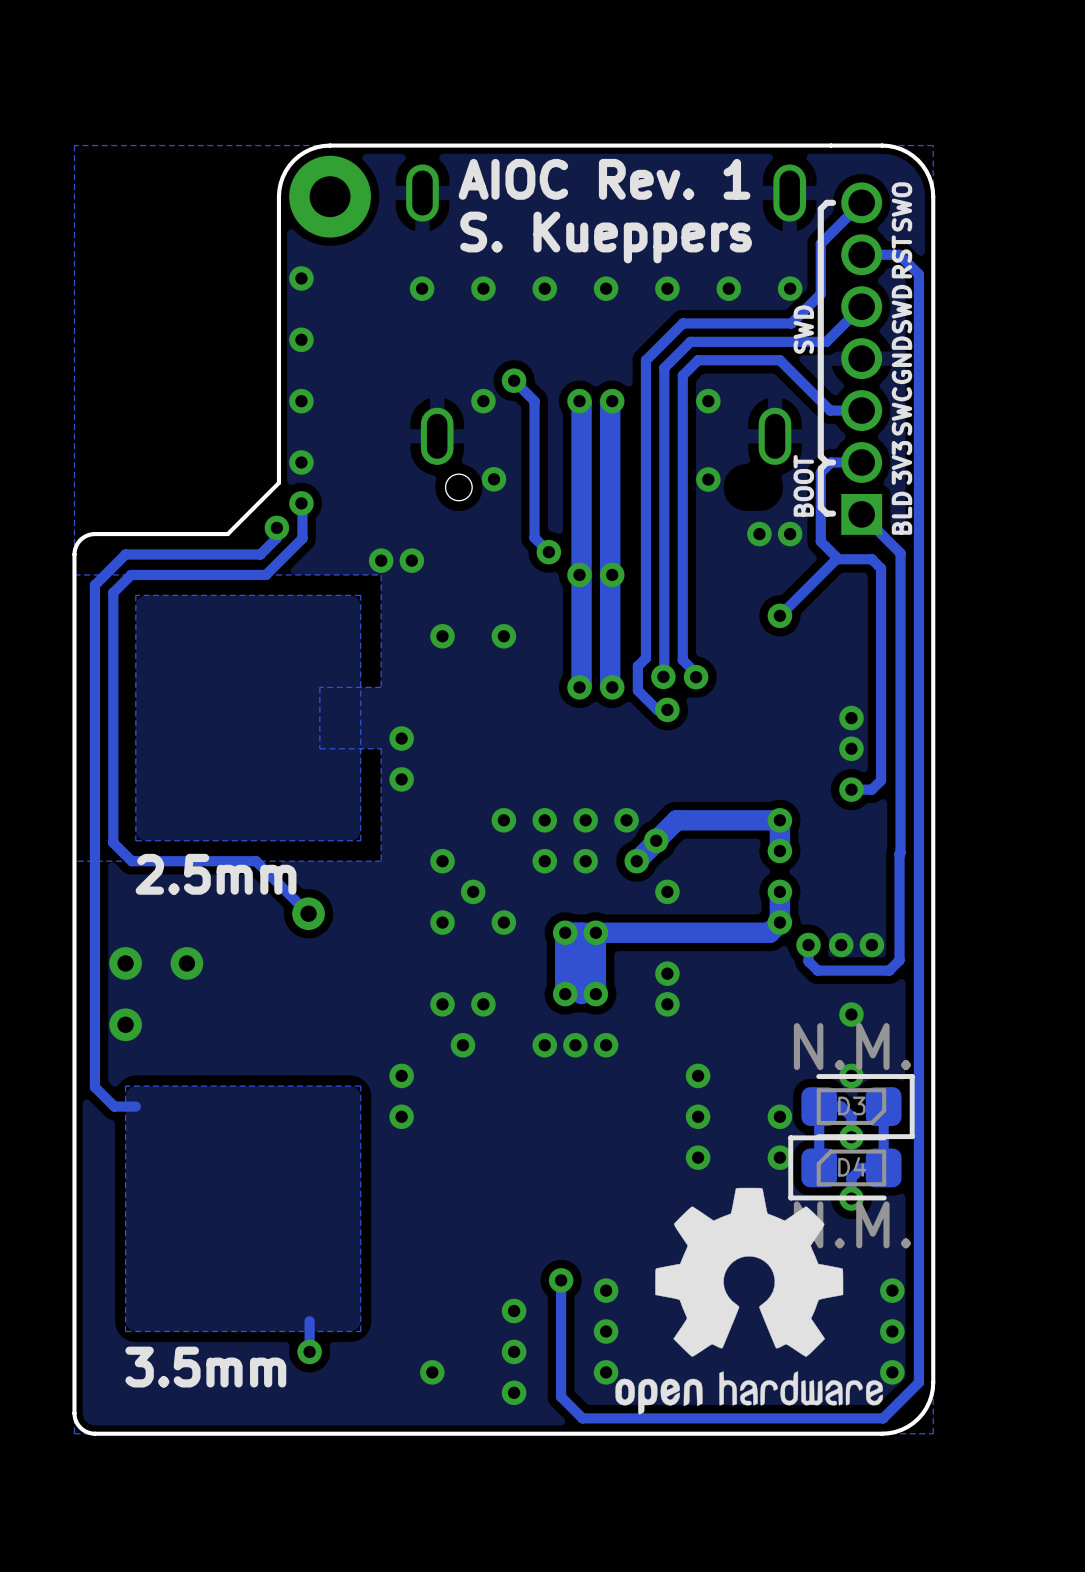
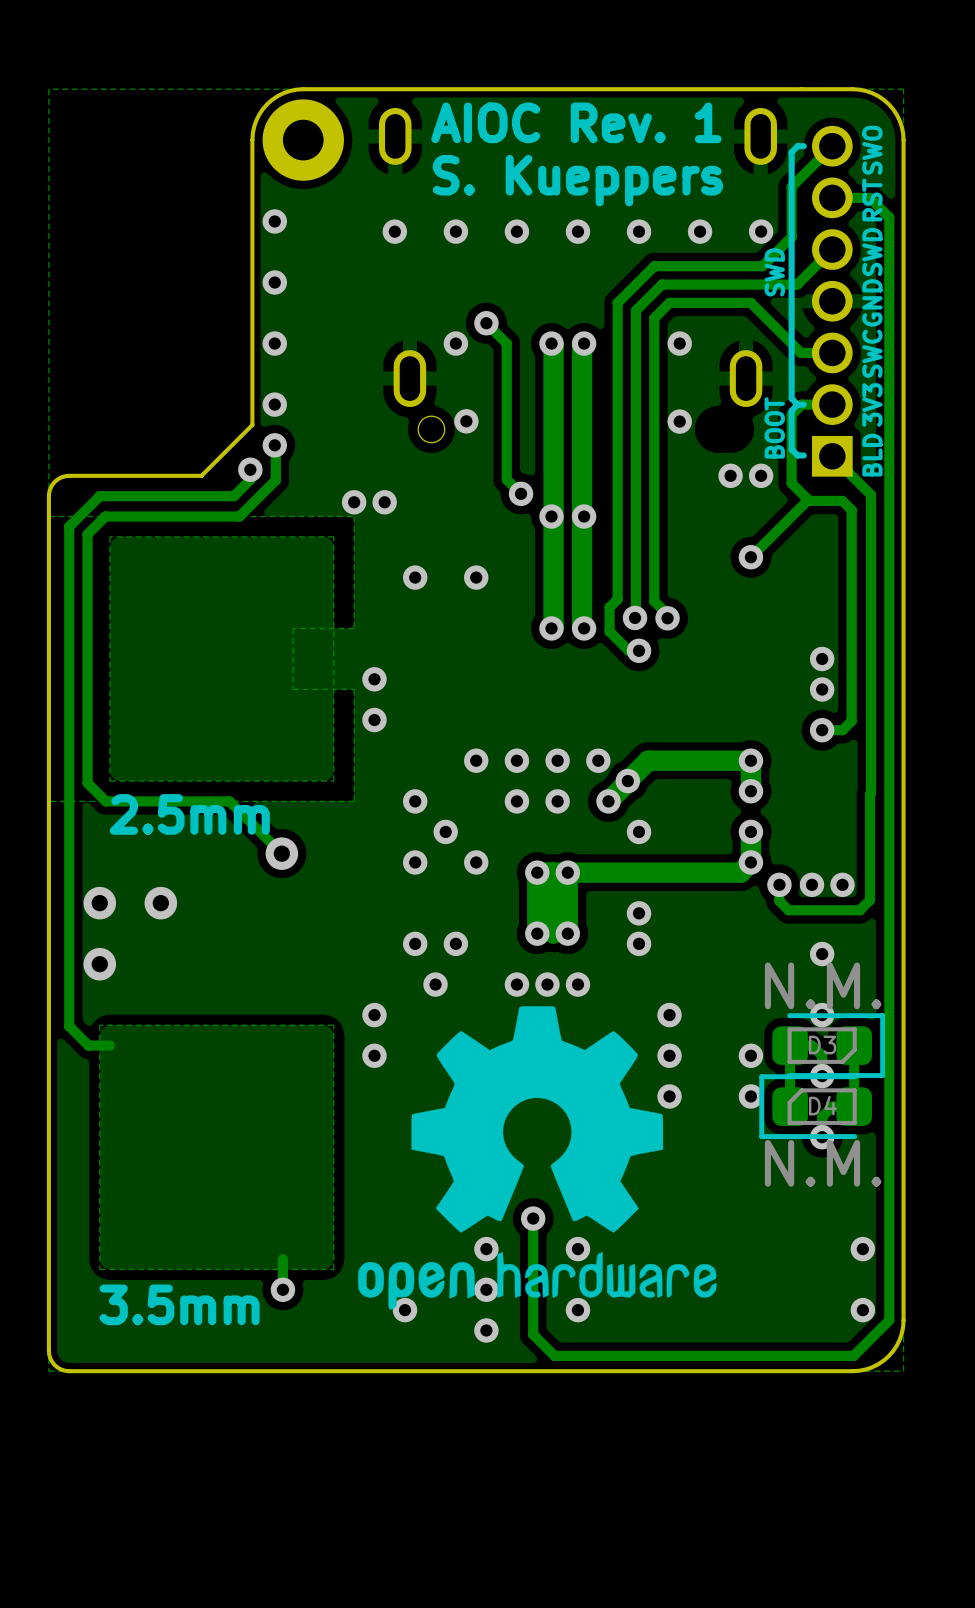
drawing: none -> [358, 1006, 717, 1310]
drawing: [615, 1187, 883, 1415] -> none
via: (606, 1290) -> none
via: (892, 1290) -> none
via: none -> (577, 1249)
via: none -> (862, 1249)
via: (606, 1331) -> none
via: (892, 1331) -> none

